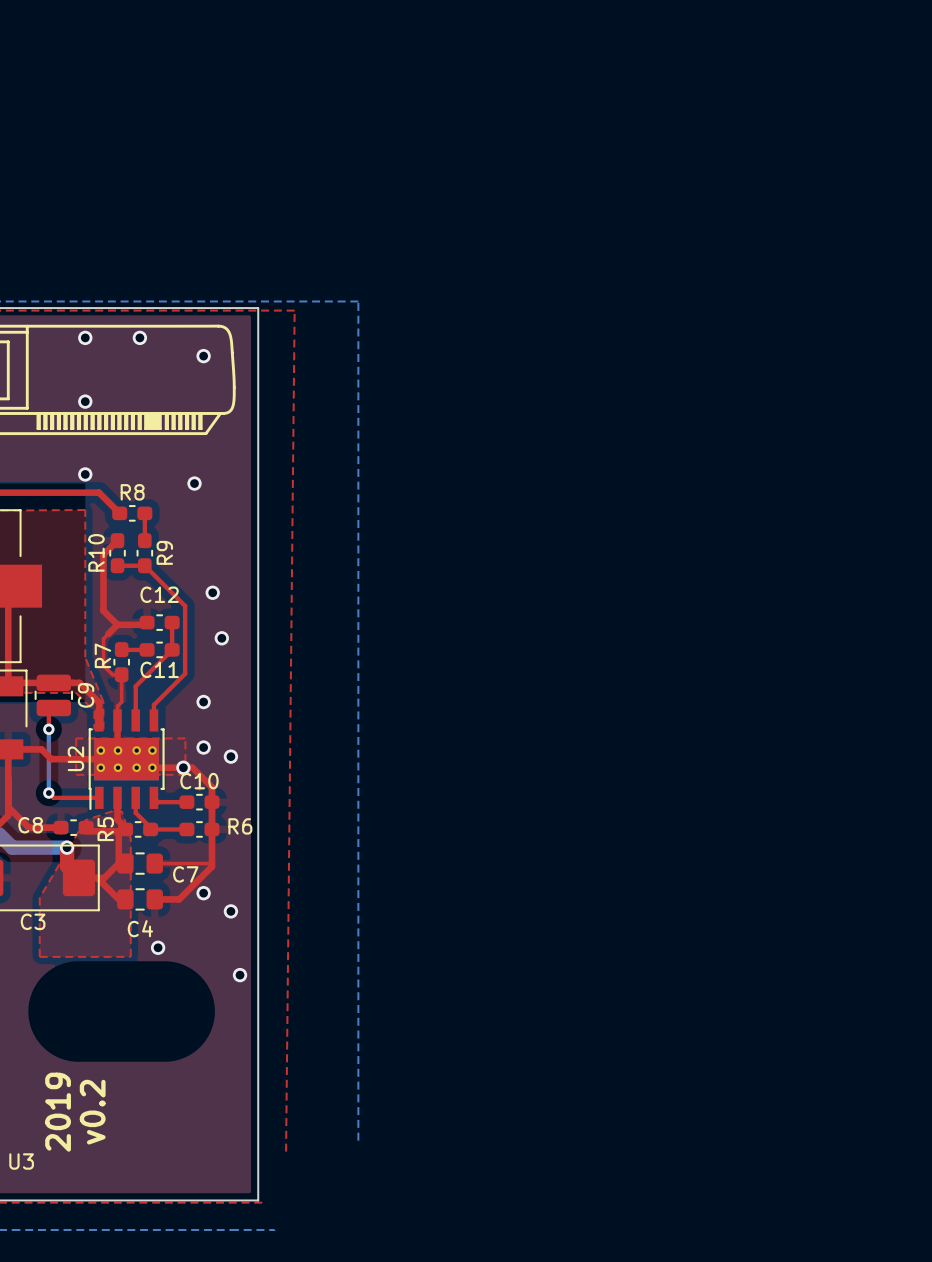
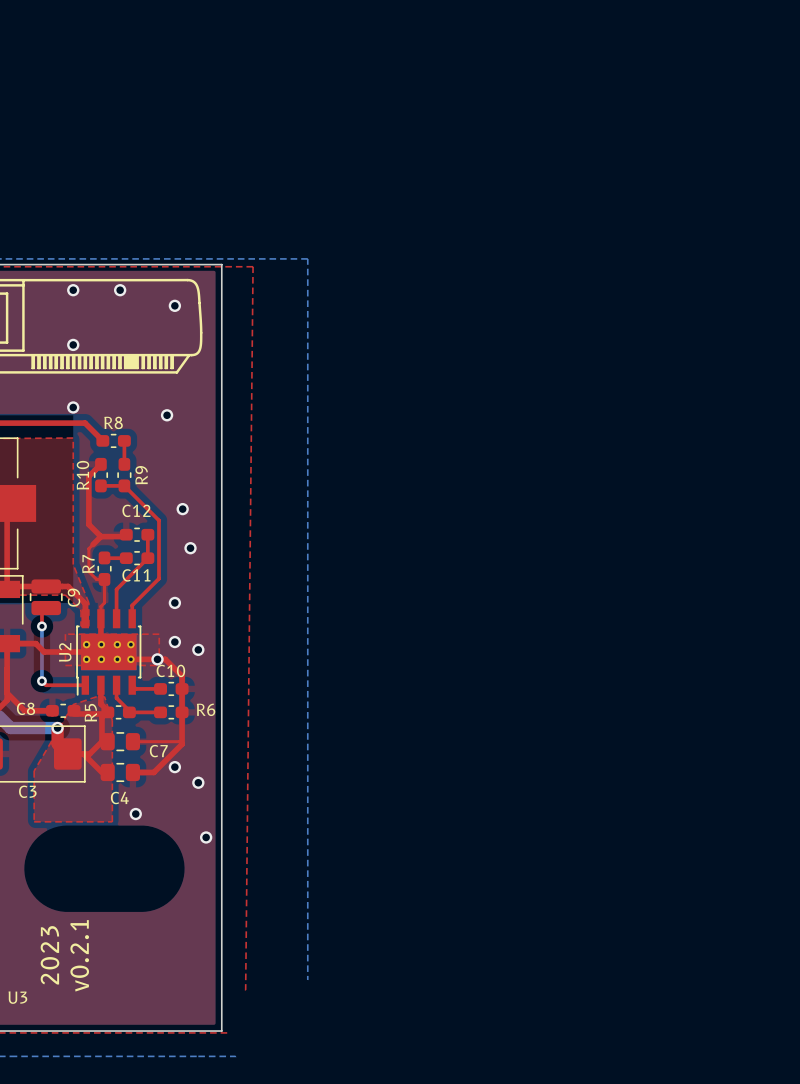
text: 2019 (58, 1112) -> 2023 (49, 955)
text: v0.2 (92, 1112) -> v0.2.1 (79, 955)

